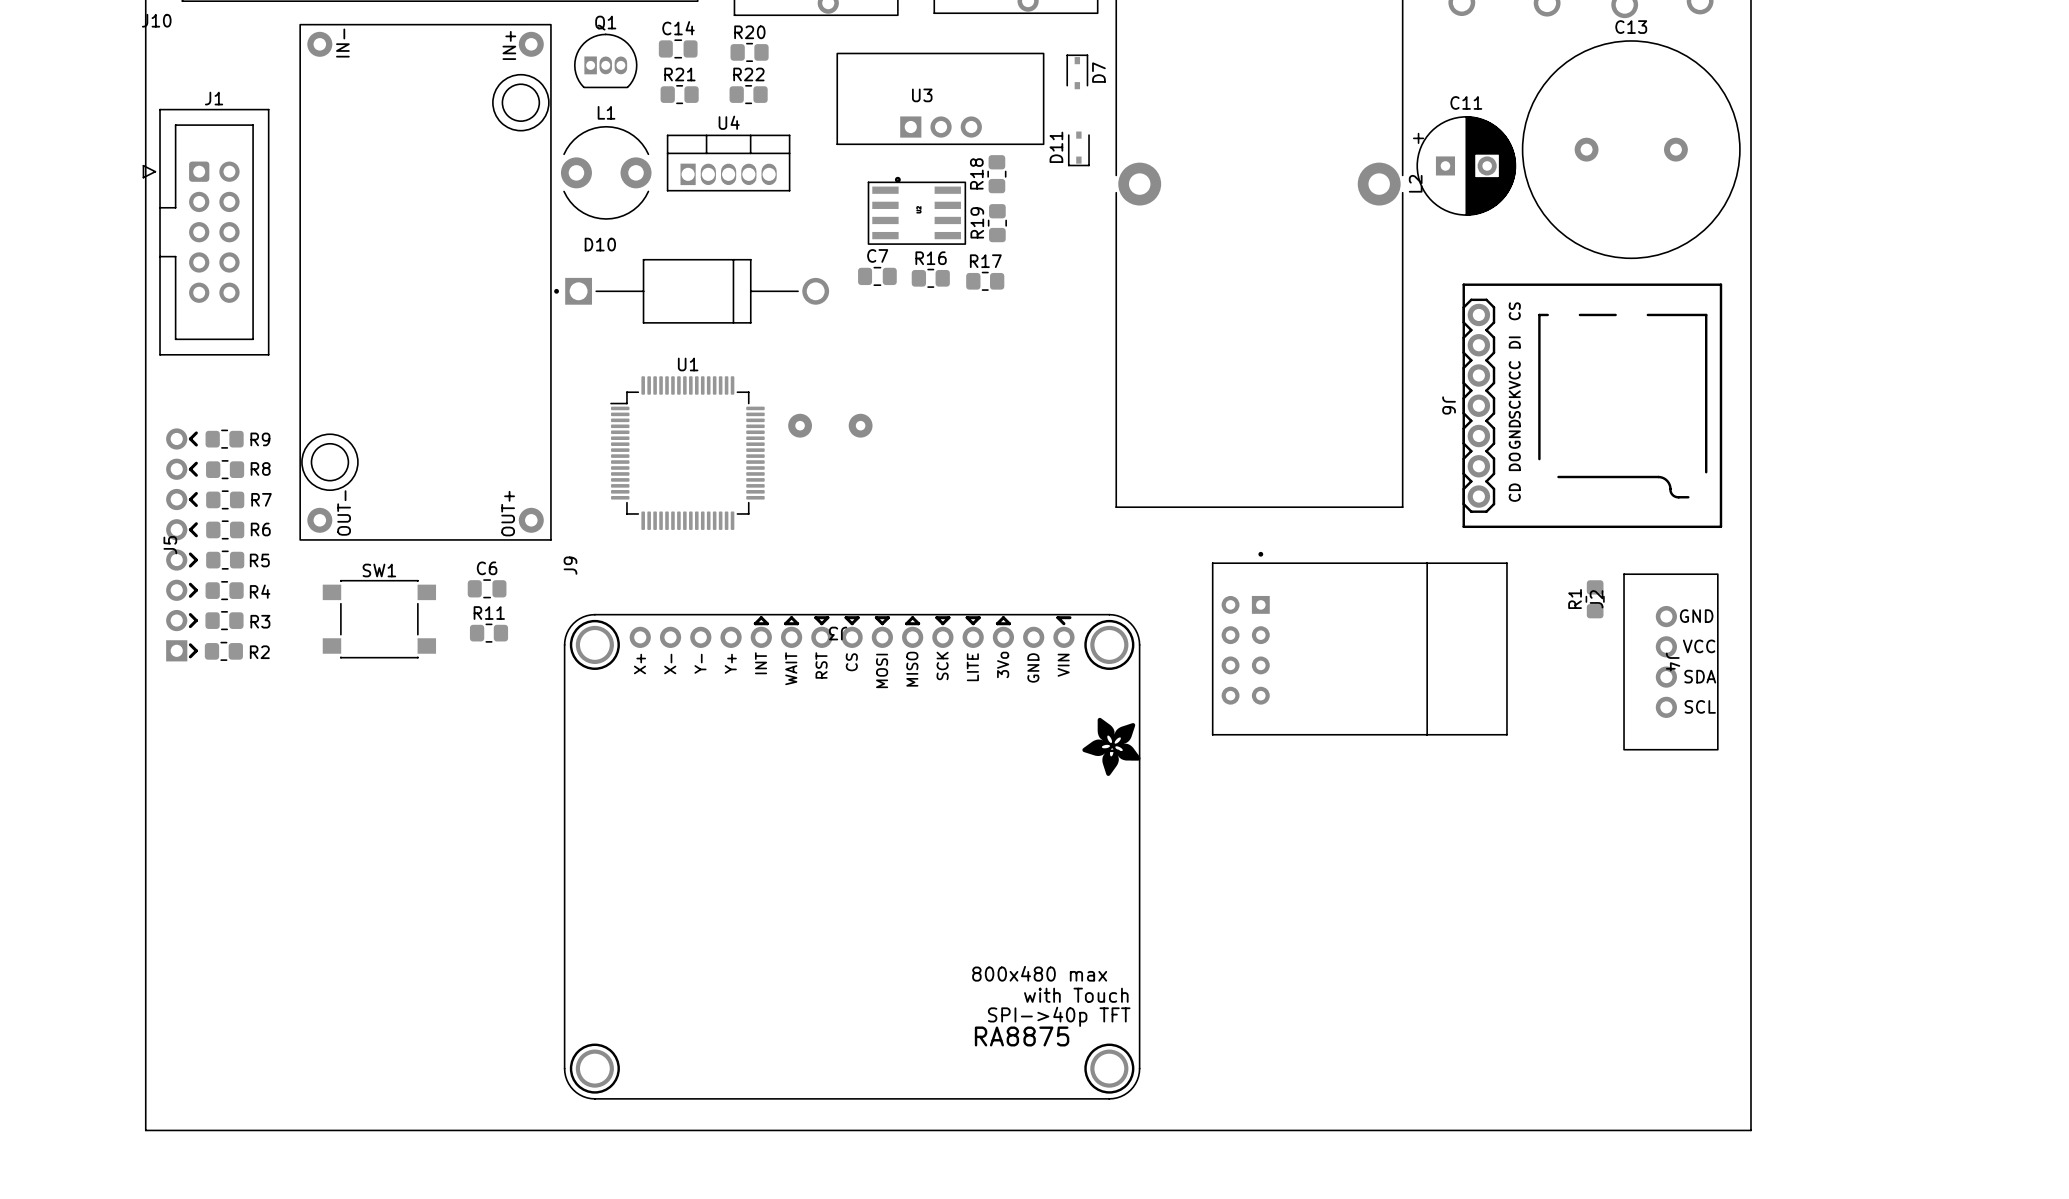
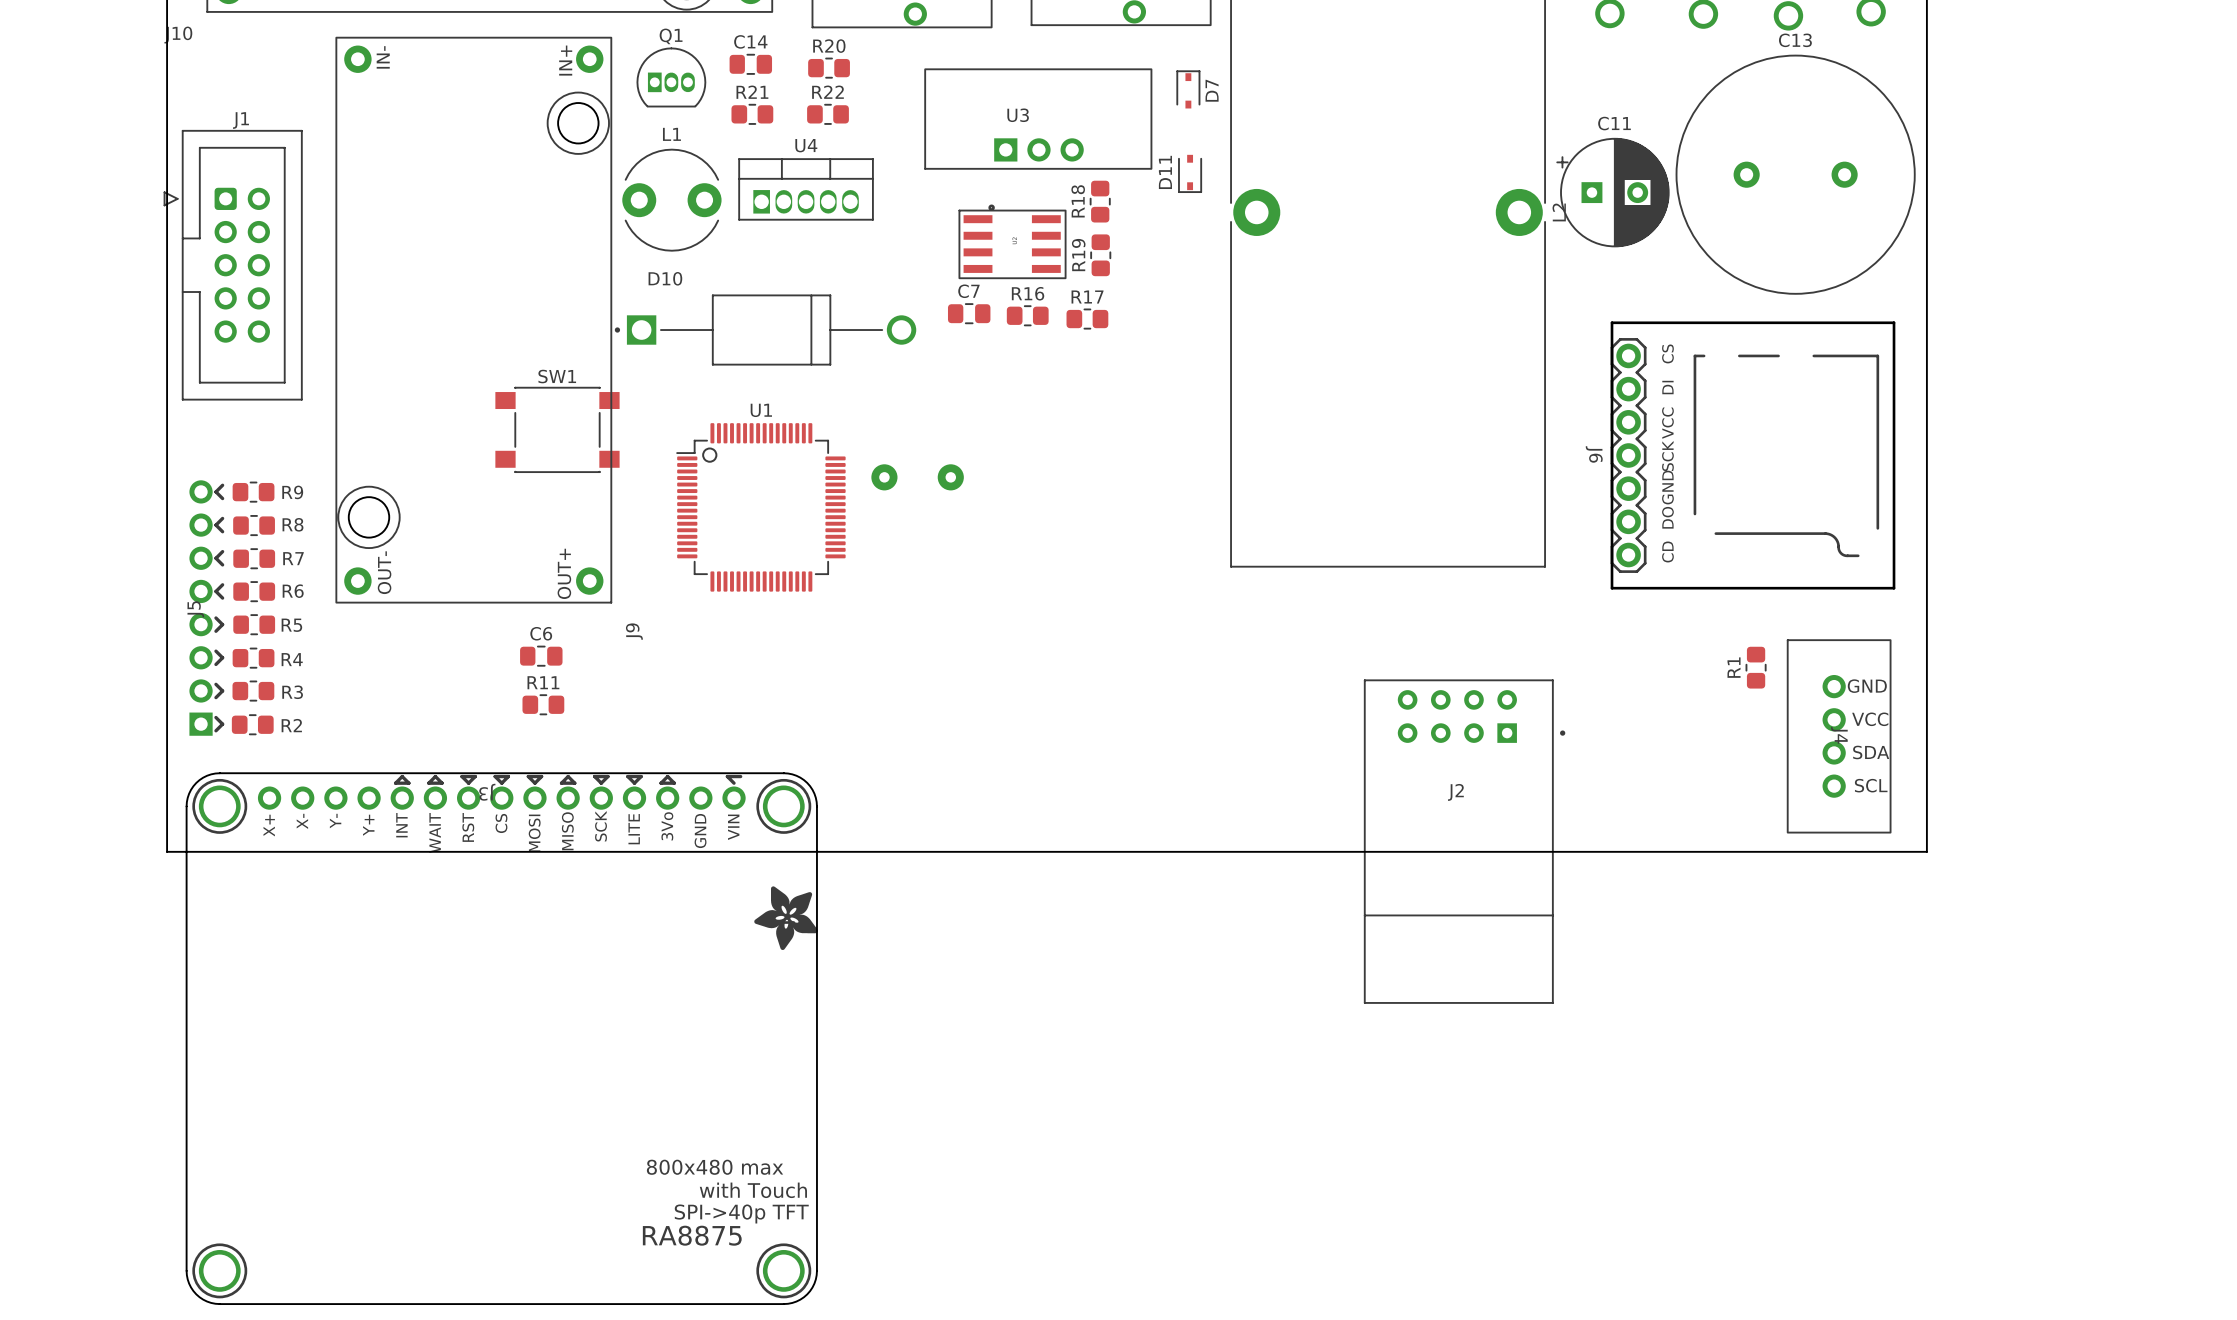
drawing: none -> [702, 447, 718, 463]
J2 name position: J2 (1596, 599) -> J2 (1455, 792)
SW1 position: (379, 619) -> (557, 429)
J2 rotation: 0° (1359, 643) -> 90° clockwise (1464, 841)
board edge: (145, 767) (145, 1130) (1750, 1130) (1750, 767) -> (167, 851) (1926, 851)
J3 position: (852, 856) -> (502, 1038)

